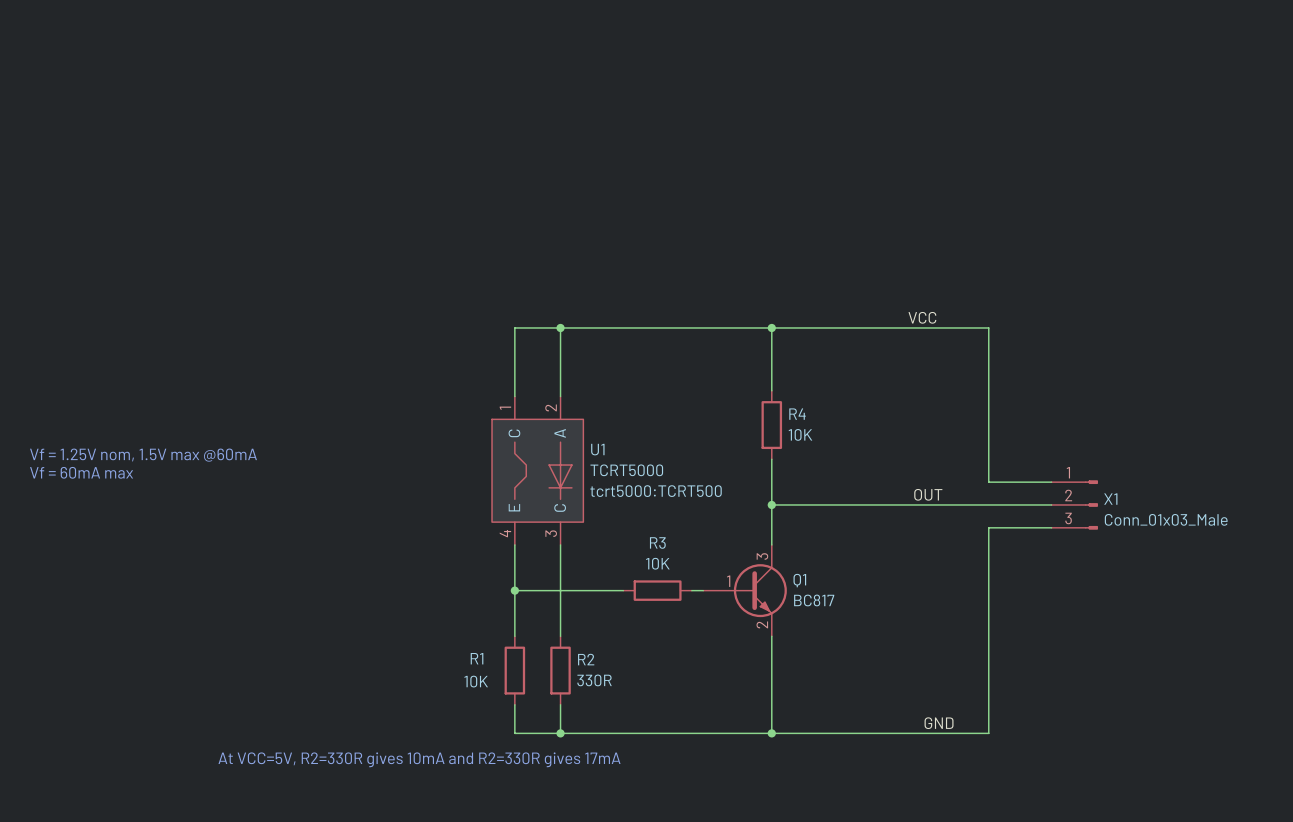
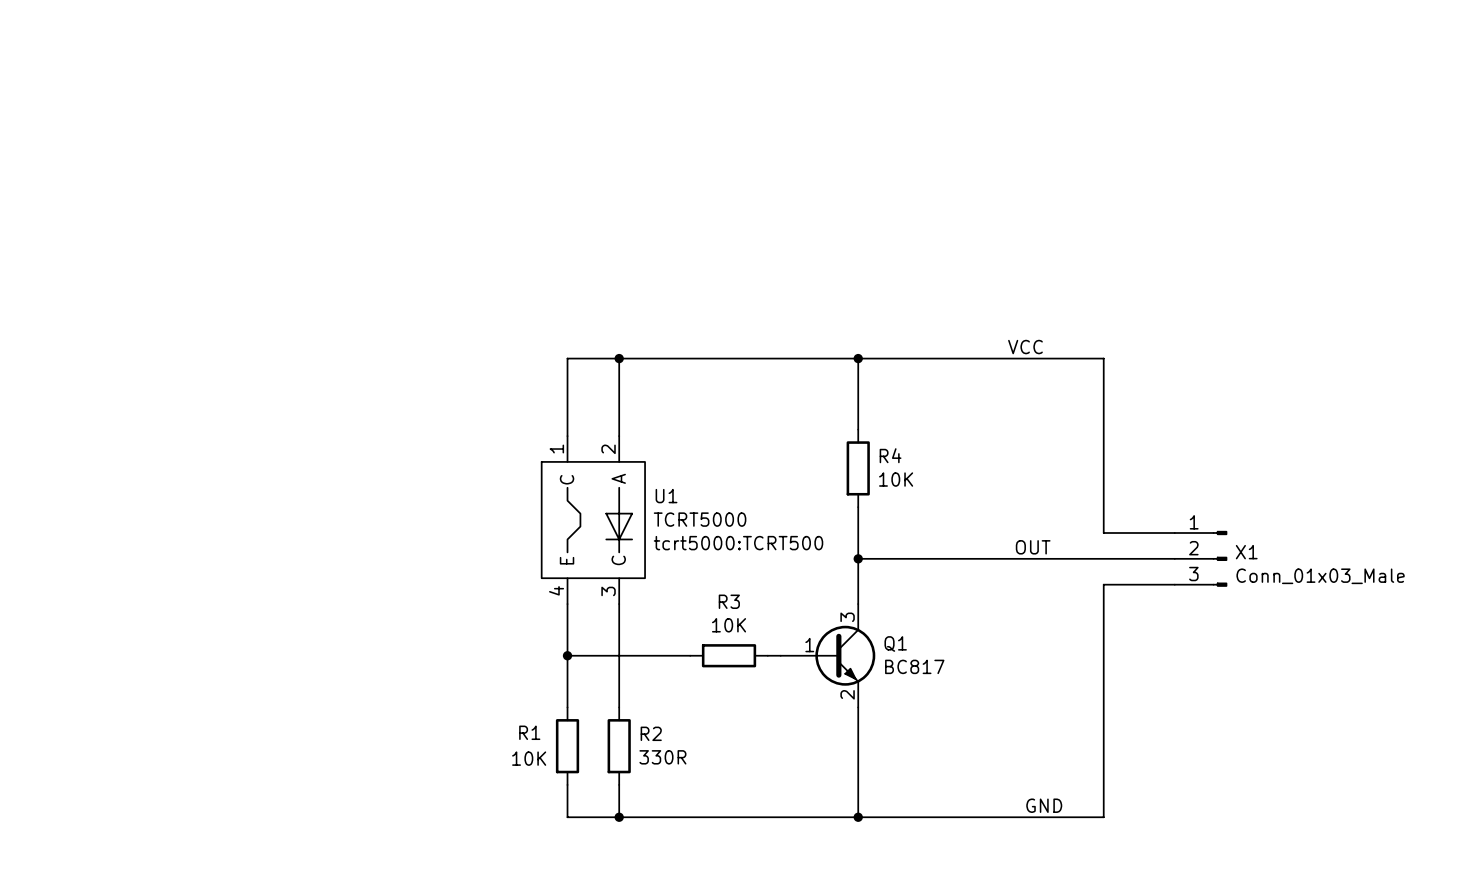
text: Vf = 1.25V nom, 1.5V max @60mA (143, 455) -> none
text: Vf = 60mA max (81, 472) -> none
text: At VCC=5V, R2=330R gives 10mA and R2=330R gives 17mA (419, 759) -> none

